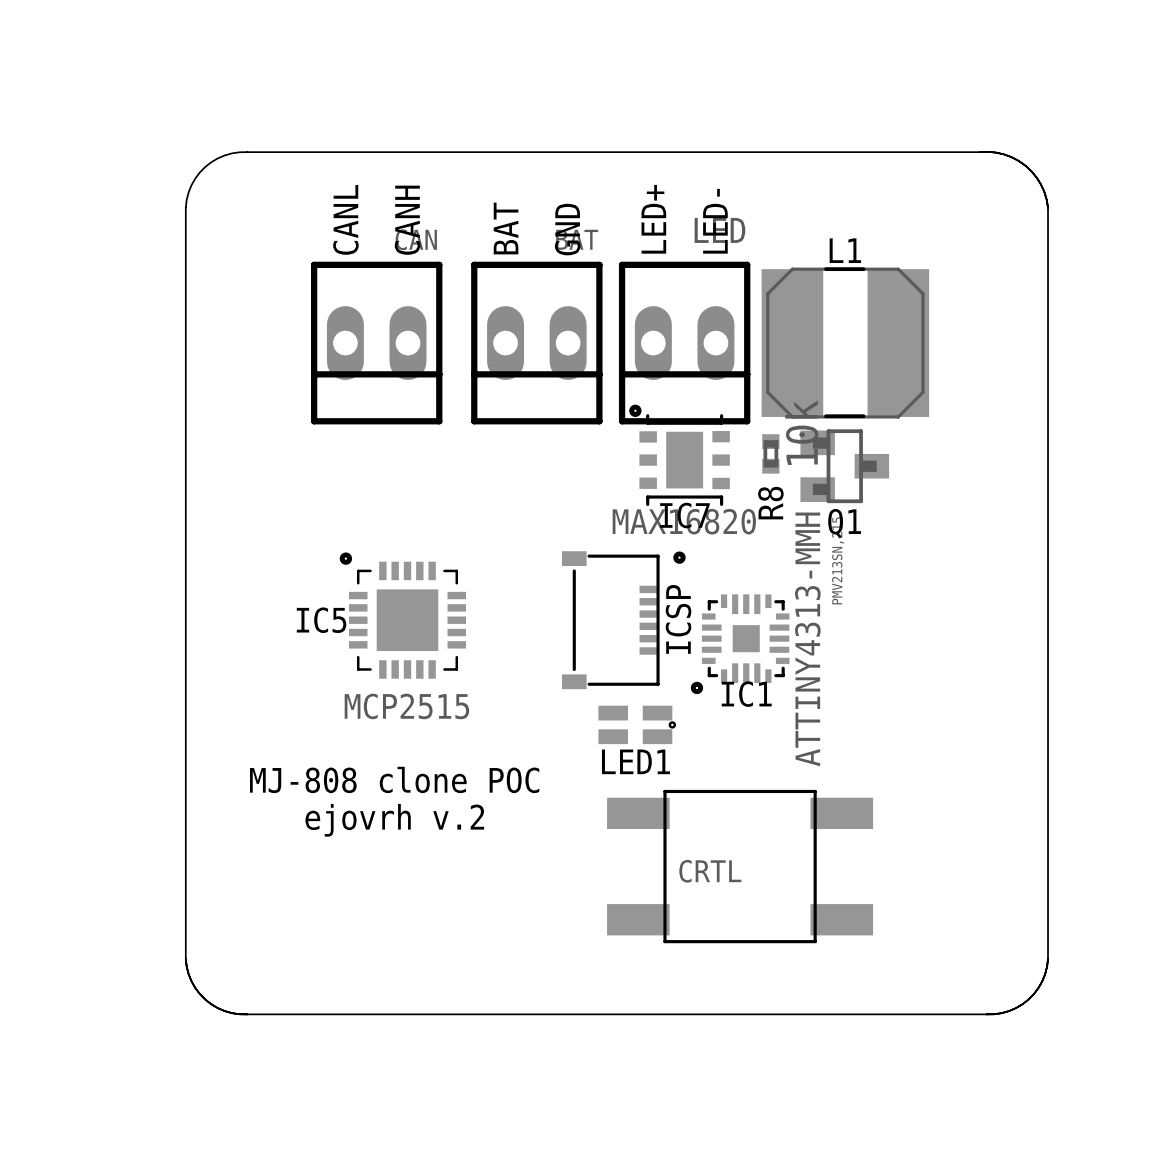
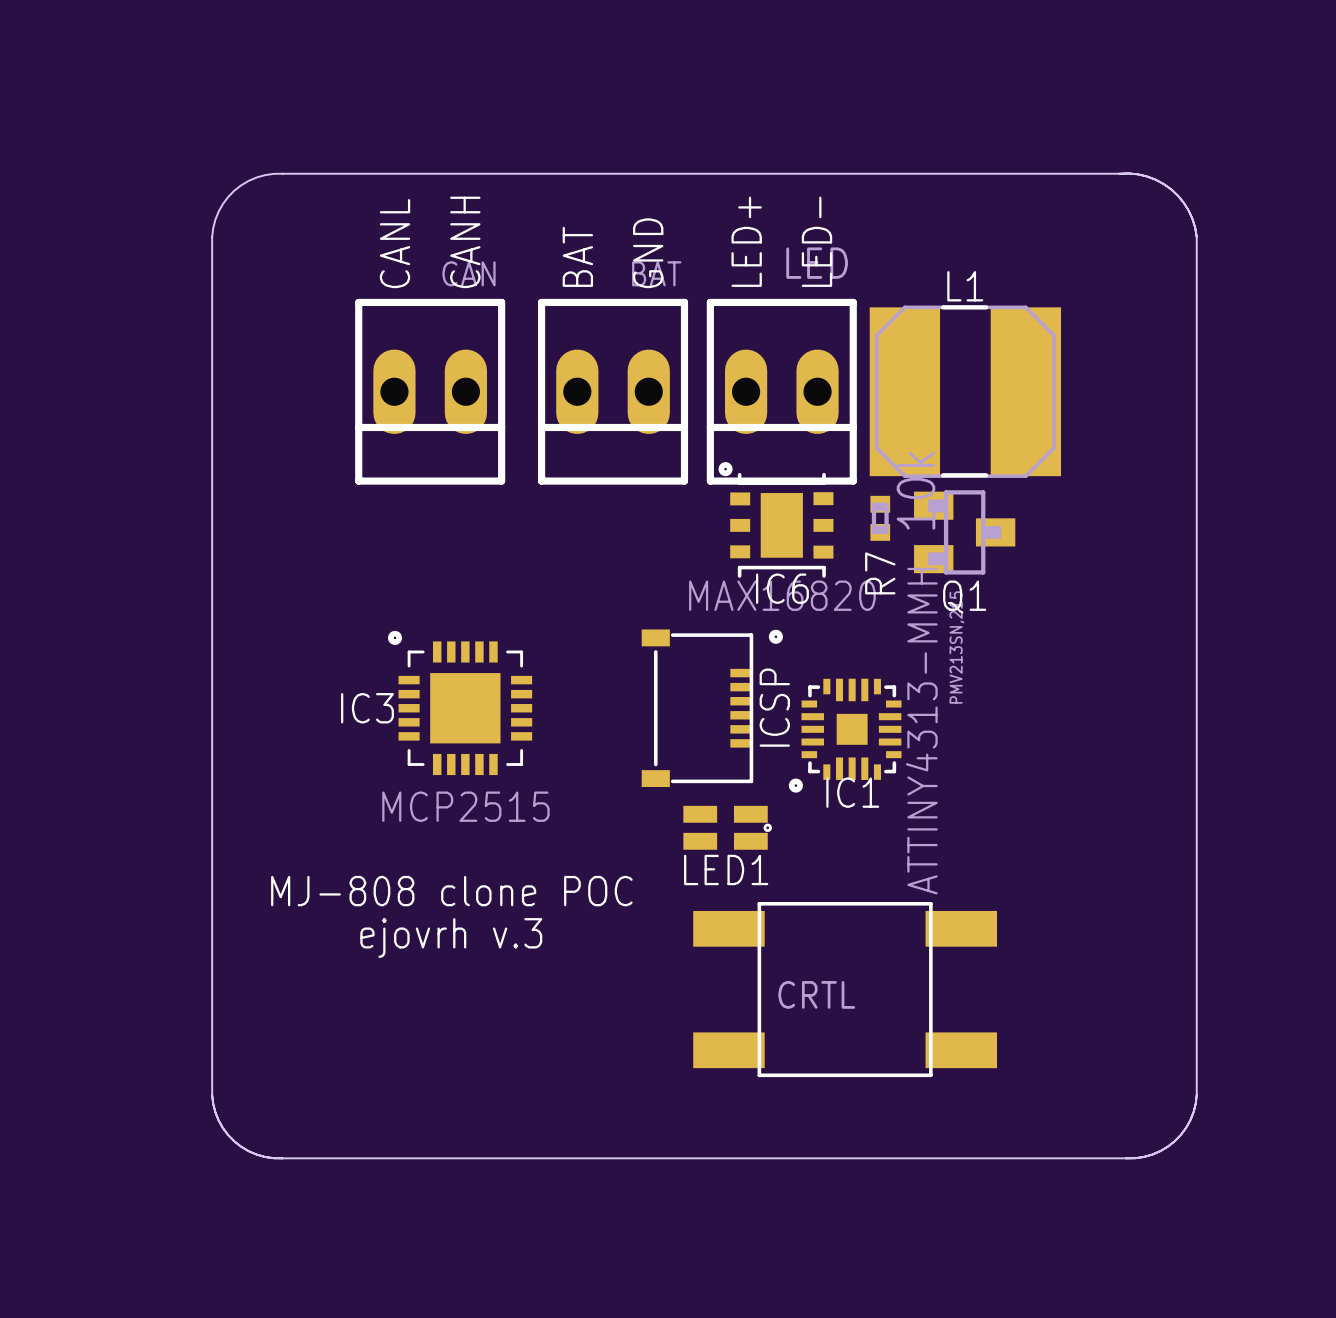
R8 name: R8 (770, 503) -> R7 (880, 573)
IC7 name: IC7 (684, 515) -> IC6 (782, 588)
IC5 name: IC5 (321, 620) -> IC3 (367, 708)
text: ejovrh v.2 (394, 820) -> ejovrh v.3 (451, 937)

